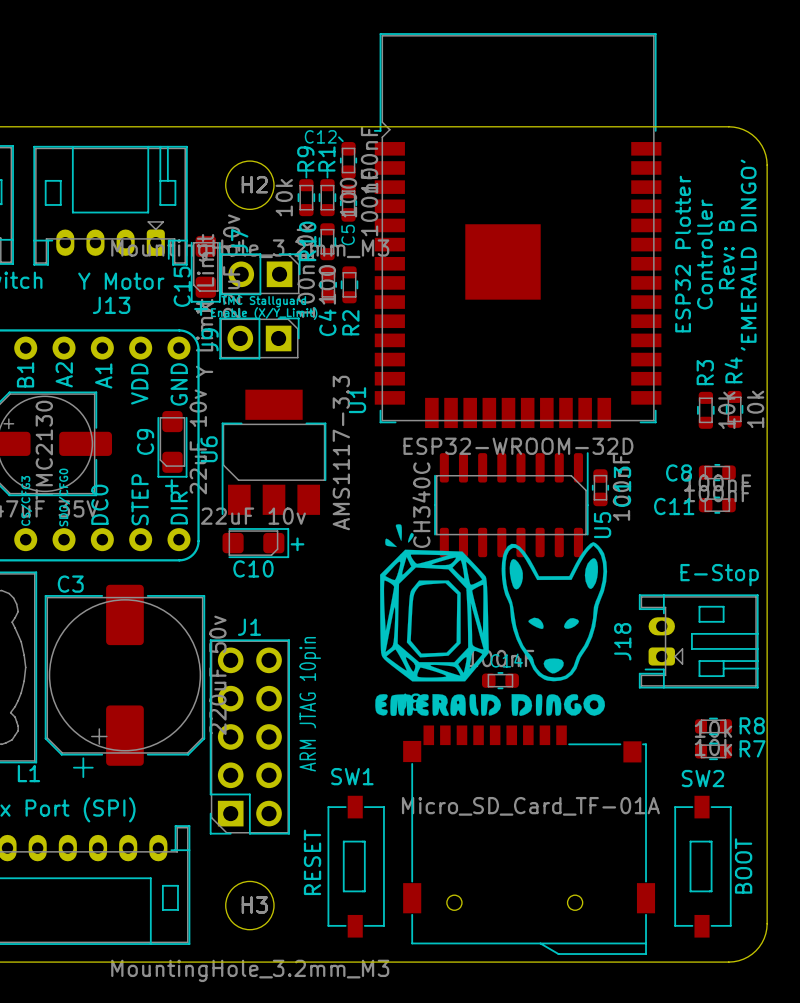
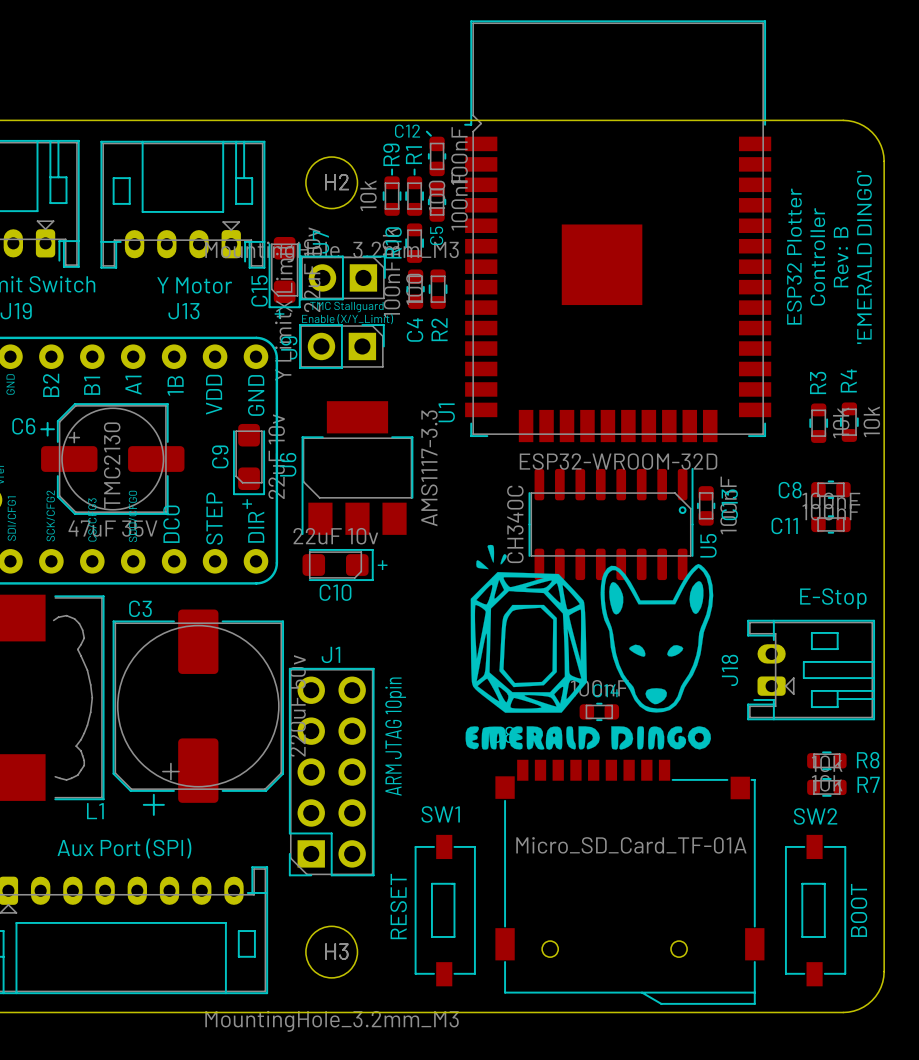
part text: A2 (64, 374) -> A1 (133, 385)
part text: A1 (103, 375) -> 1B (175, 385)
U5 footprint: [434, 452, 589, 558] -> [528, 467, 694, 581]

